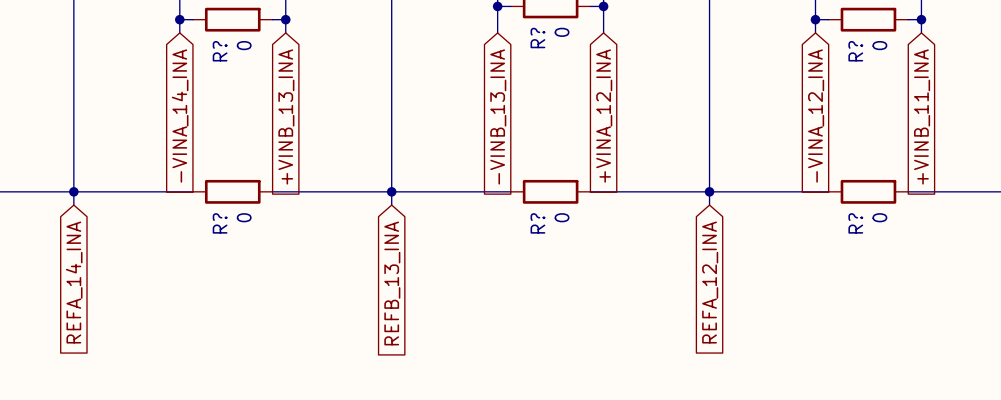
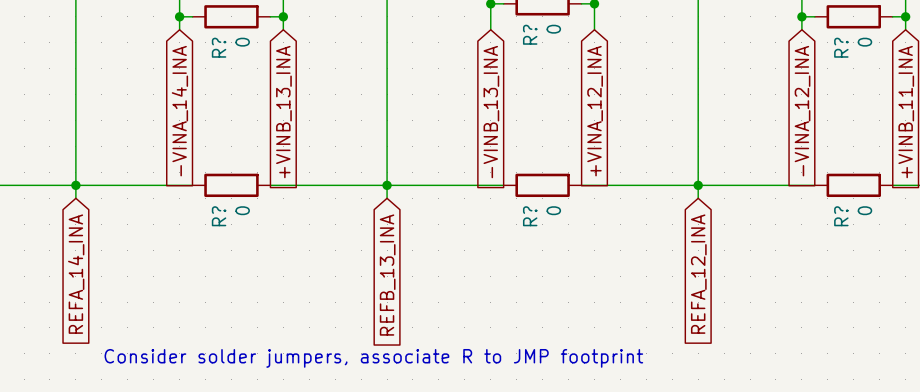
text: none -> Consider solder jumpers, associate R to JMP footprint (373, 358)

